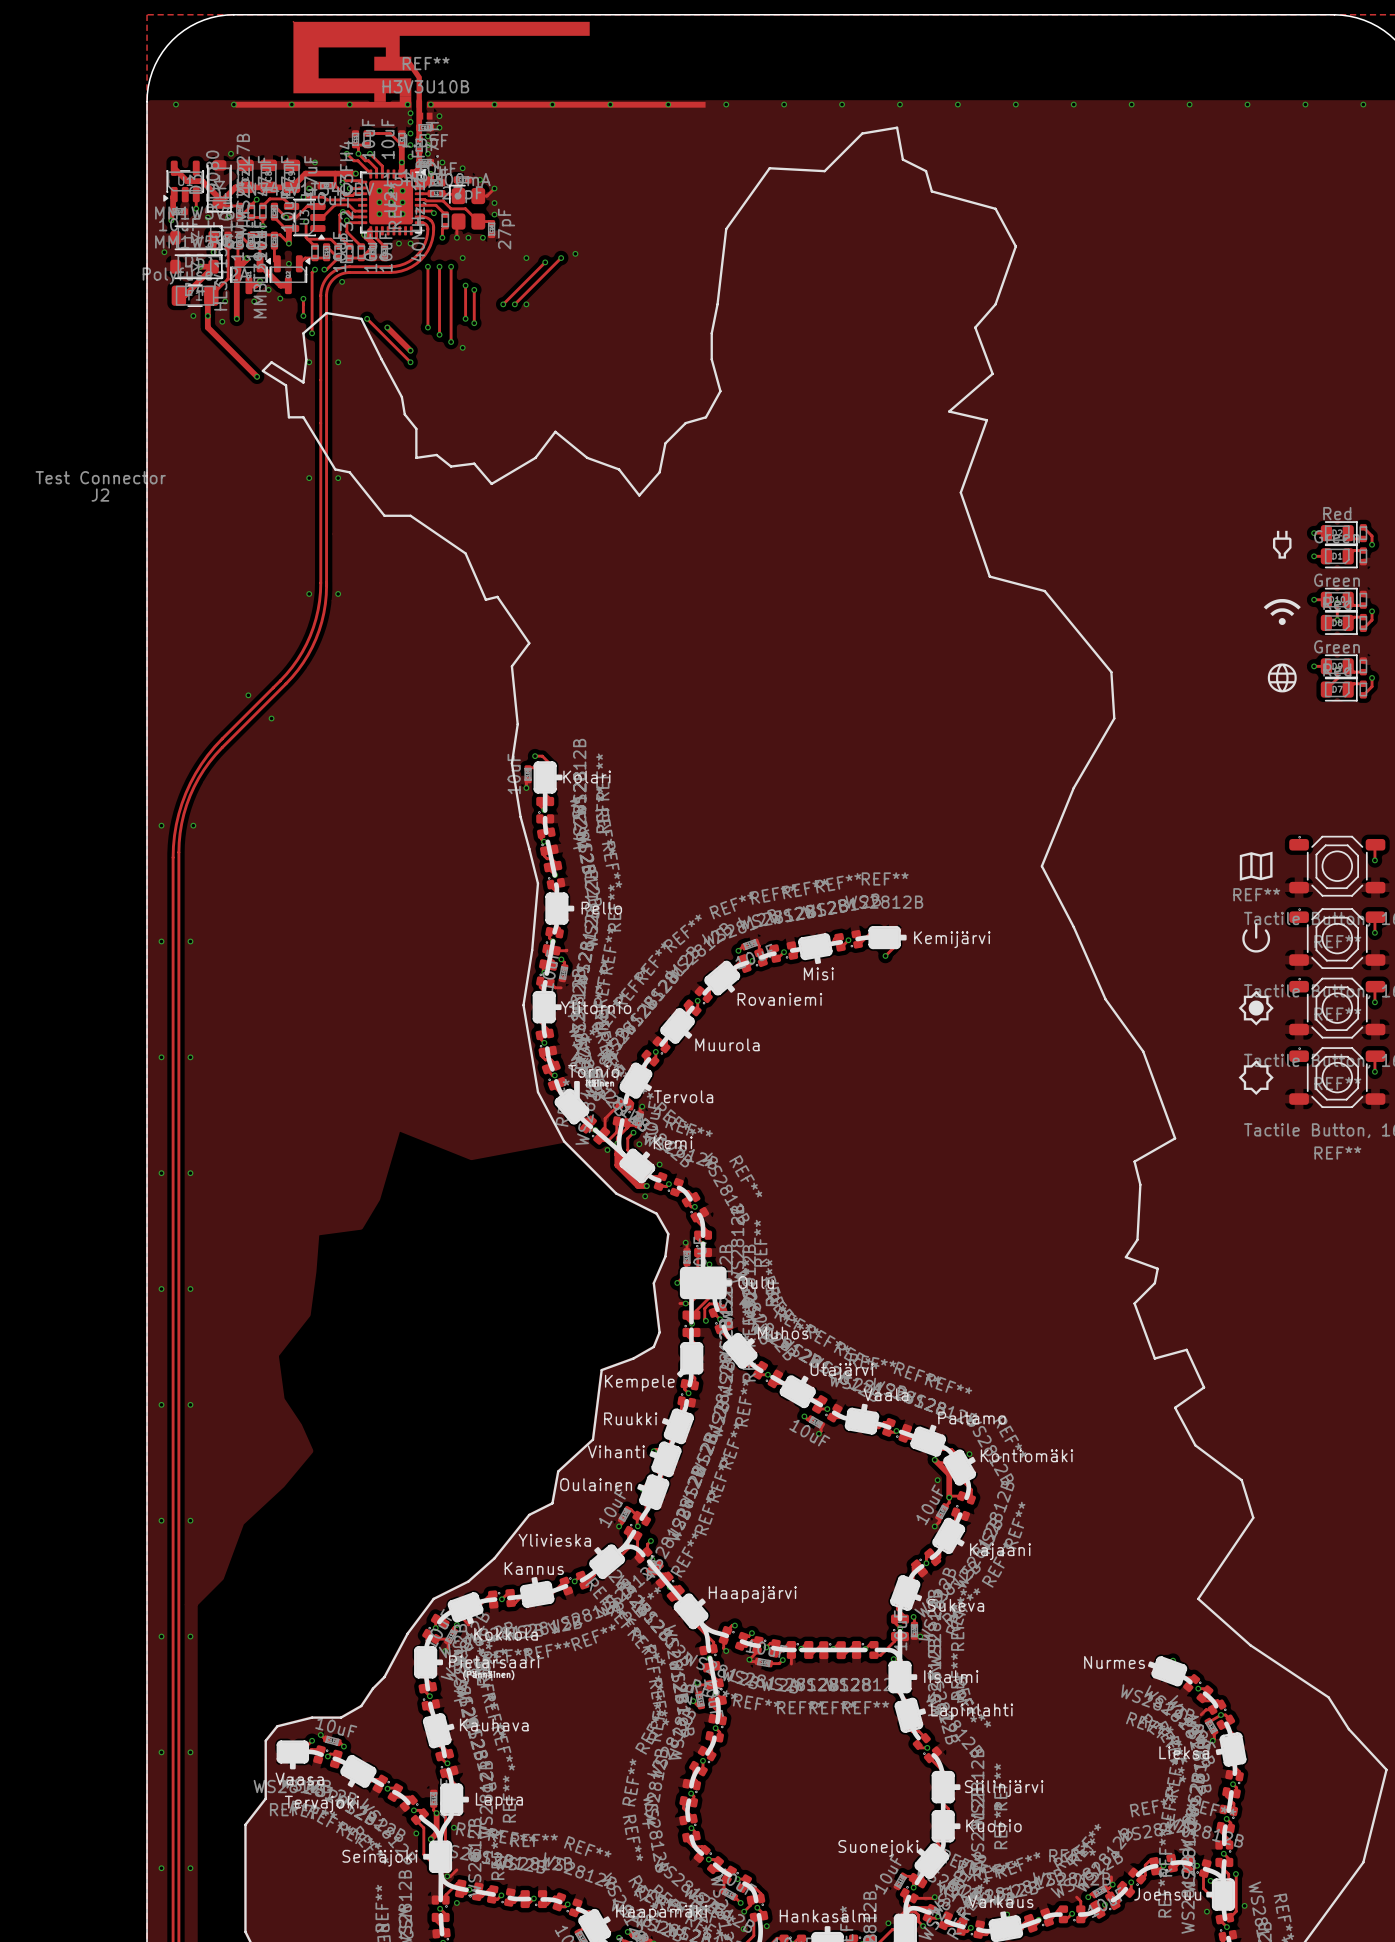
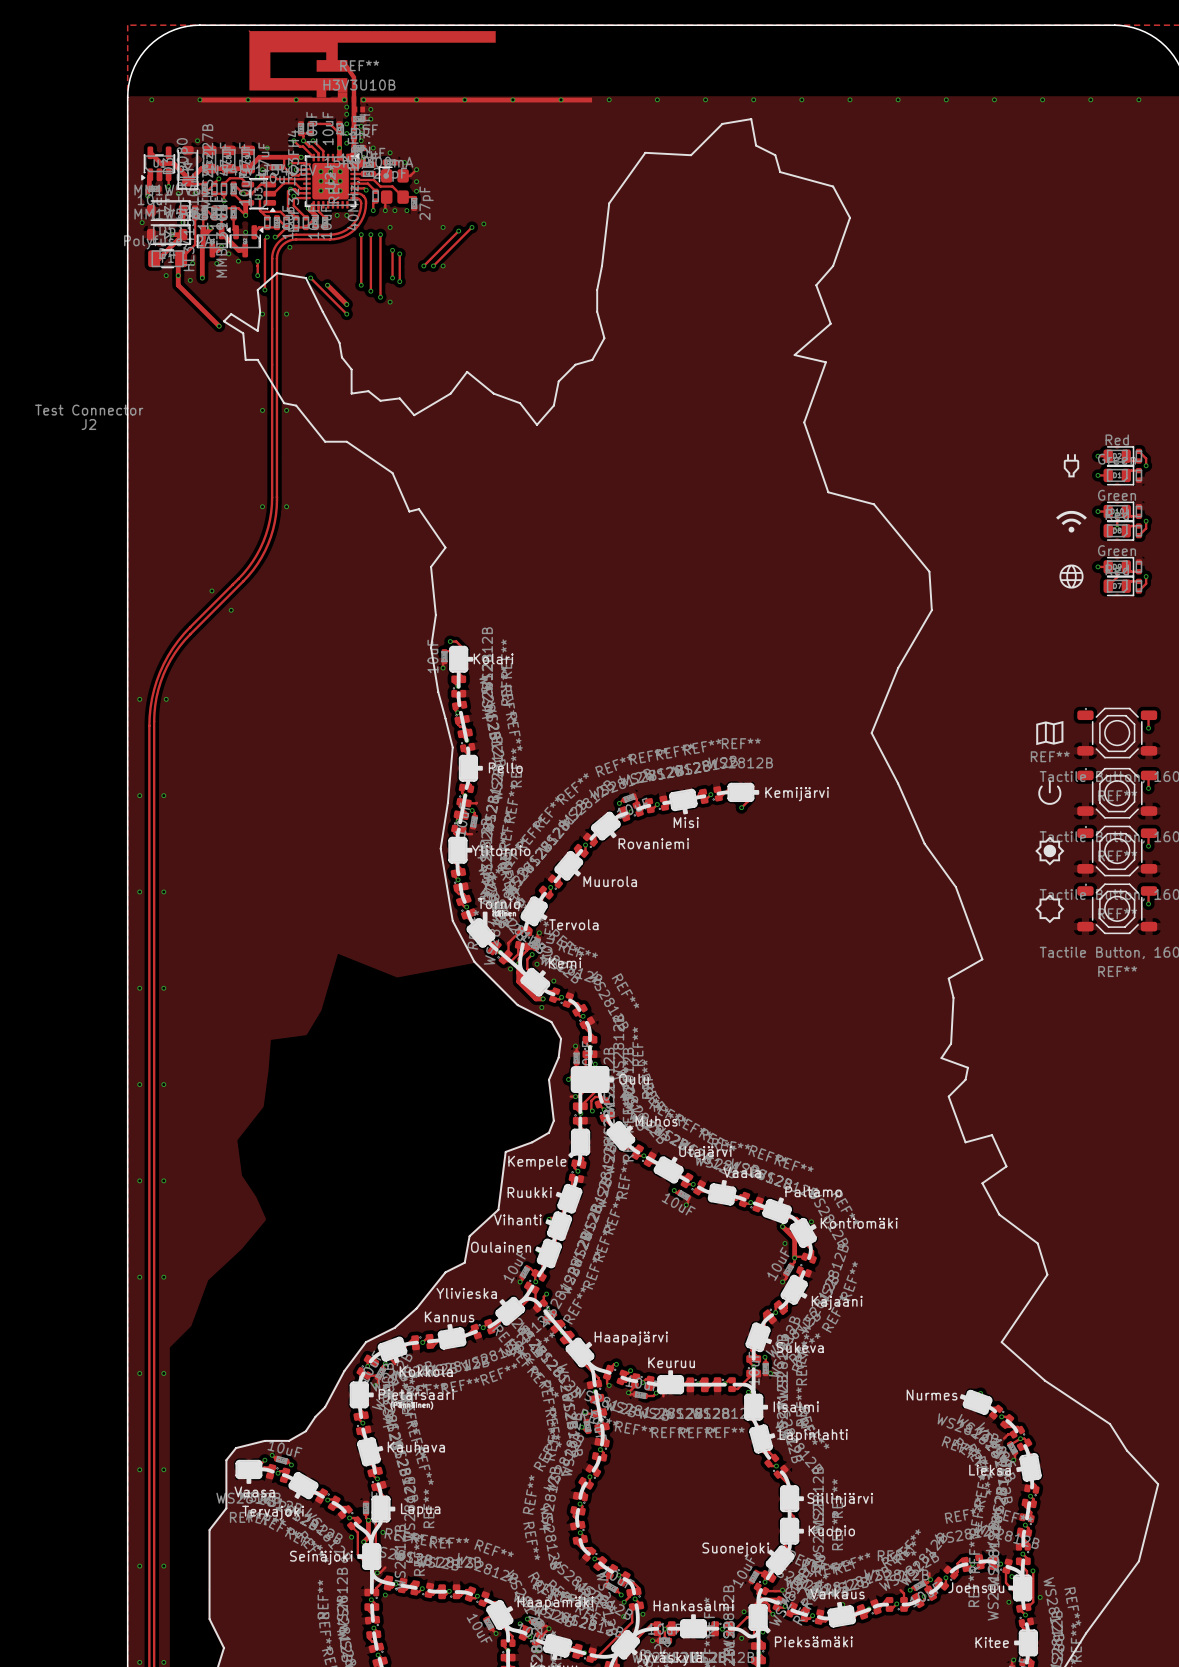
drawing: none -> [657, 1370, 685, 1395]

